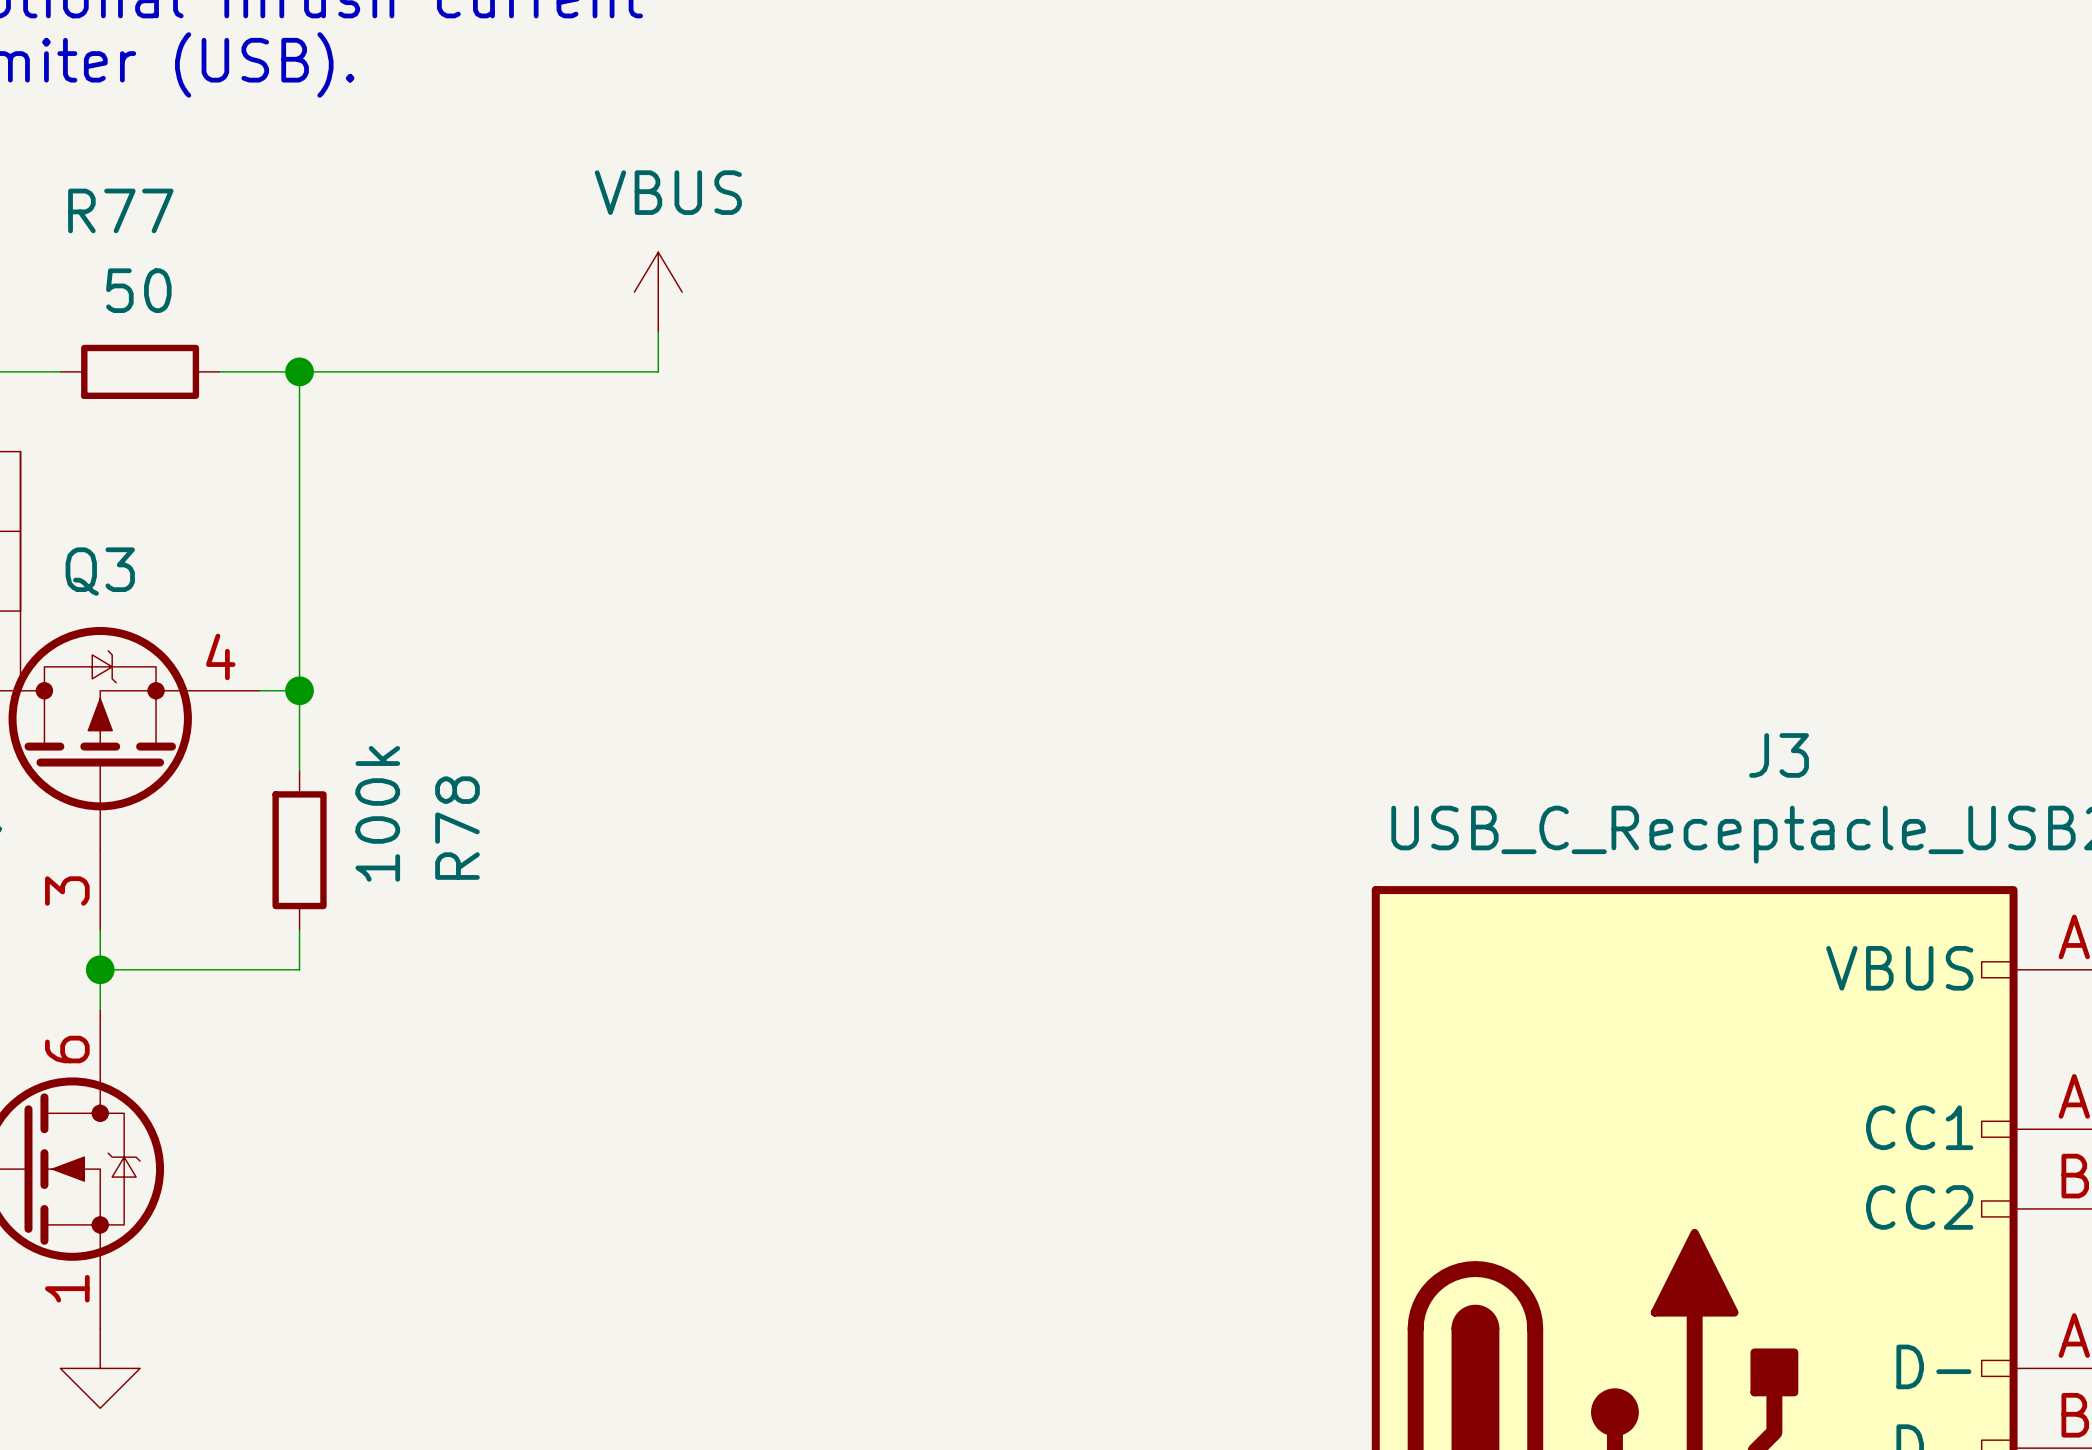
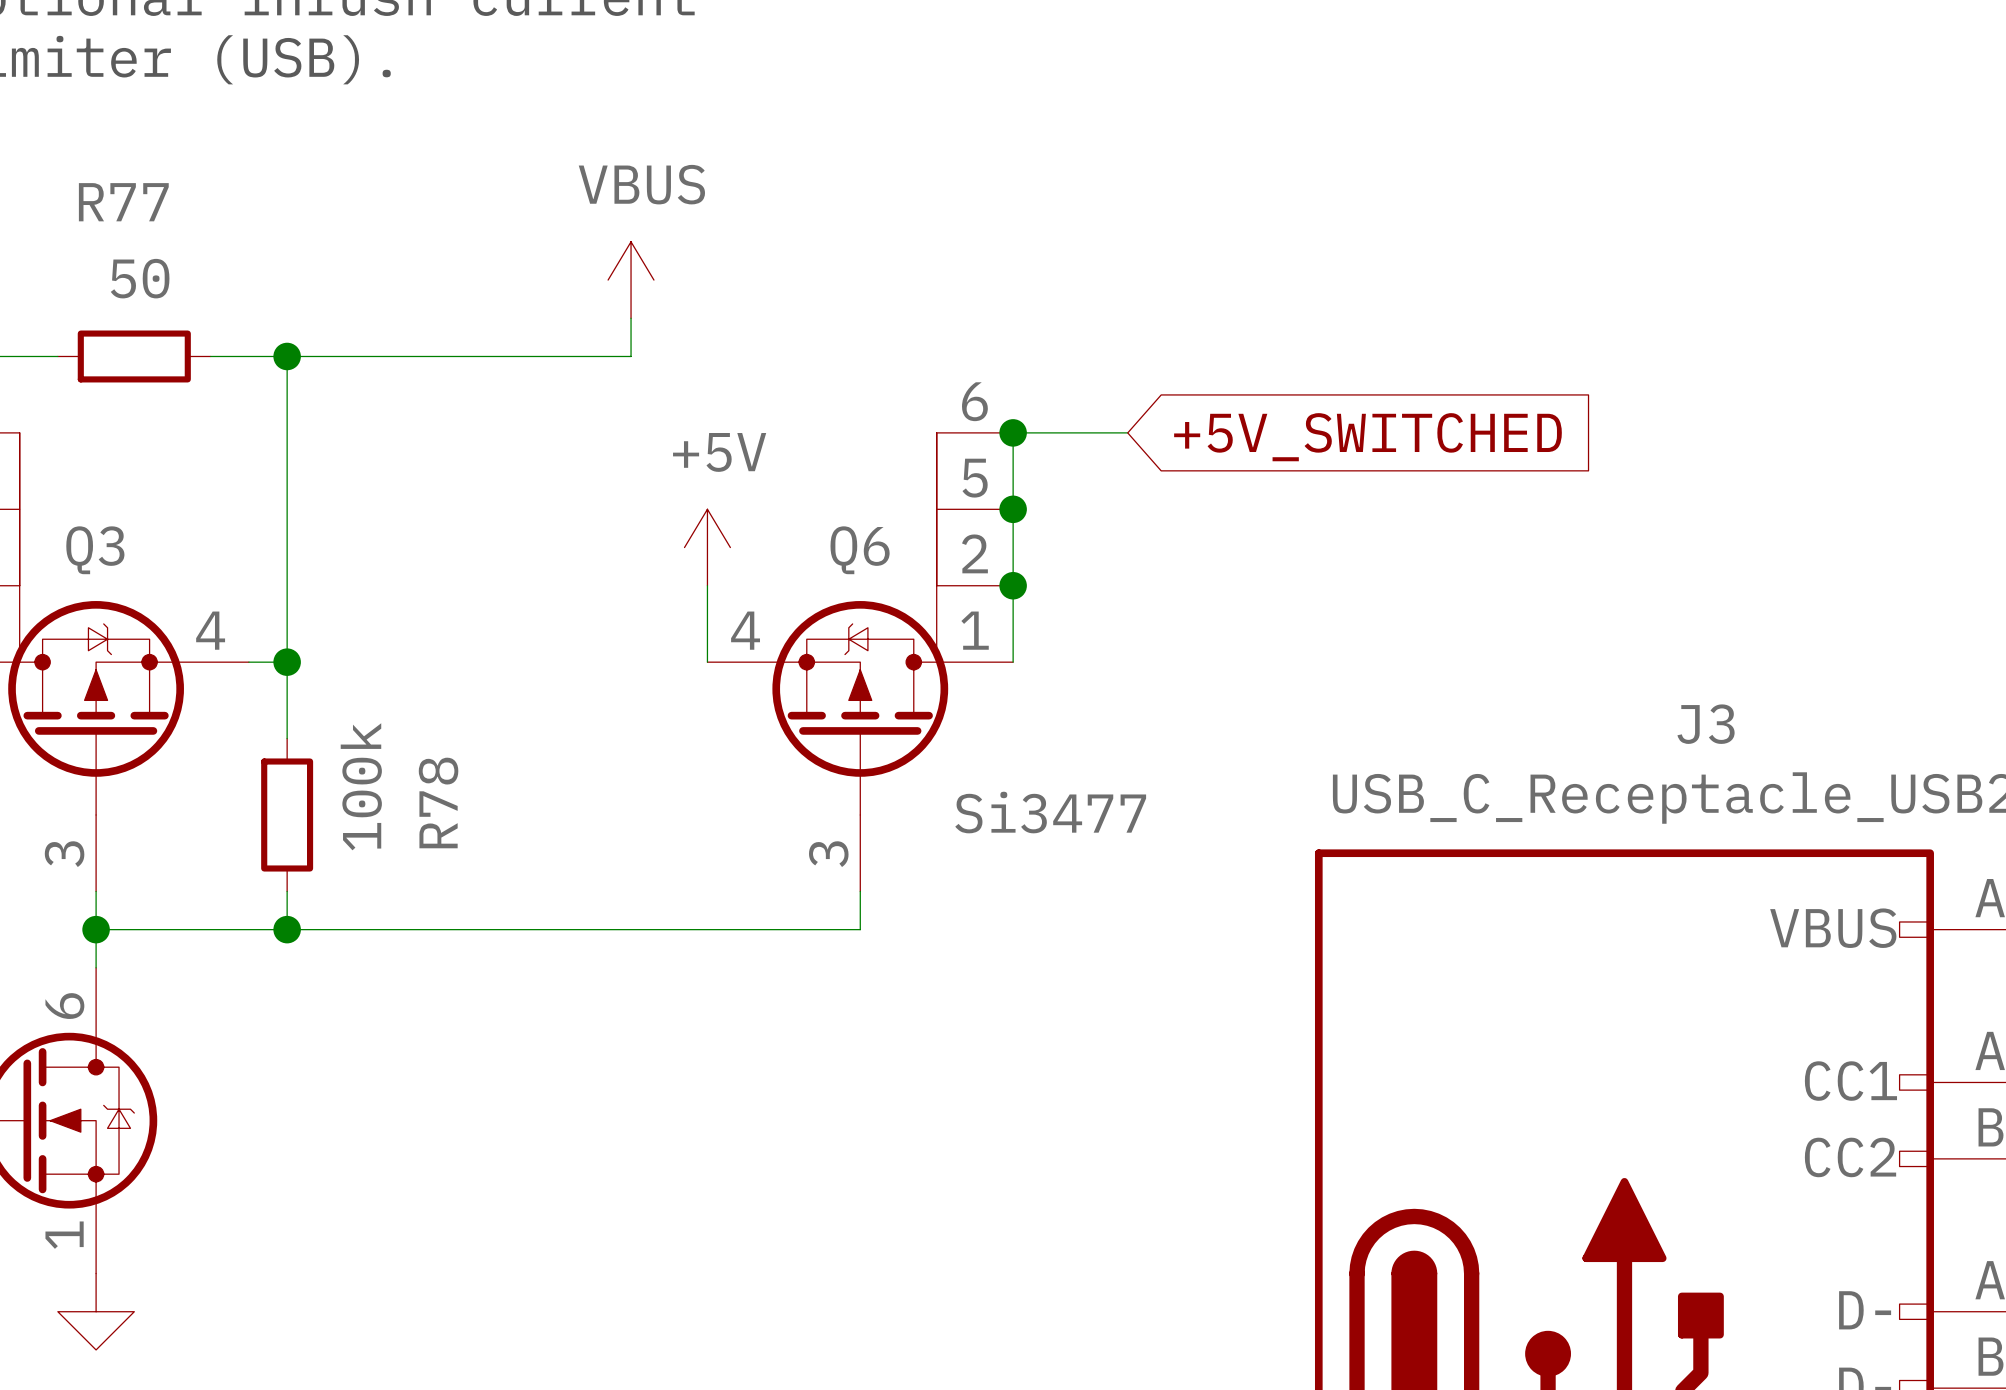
junction: none -> (1013, 432)
wire: none -> (1127, 432) (1013, 432) (1013, 662)
global label: none -> +5V_SWITCHED (1367, 437)
junction: none -> (1013, 509)
power symbol: none -> +5V (707, 547)
wire: none -> (707, 585) (707, 662)
junction: none -> (1013, 585)
Q6: none -> Si3477 (860, 662)
wire: none -> (860, 891) (860, 929) (287, 929)
junction: none -> (287, 929)

